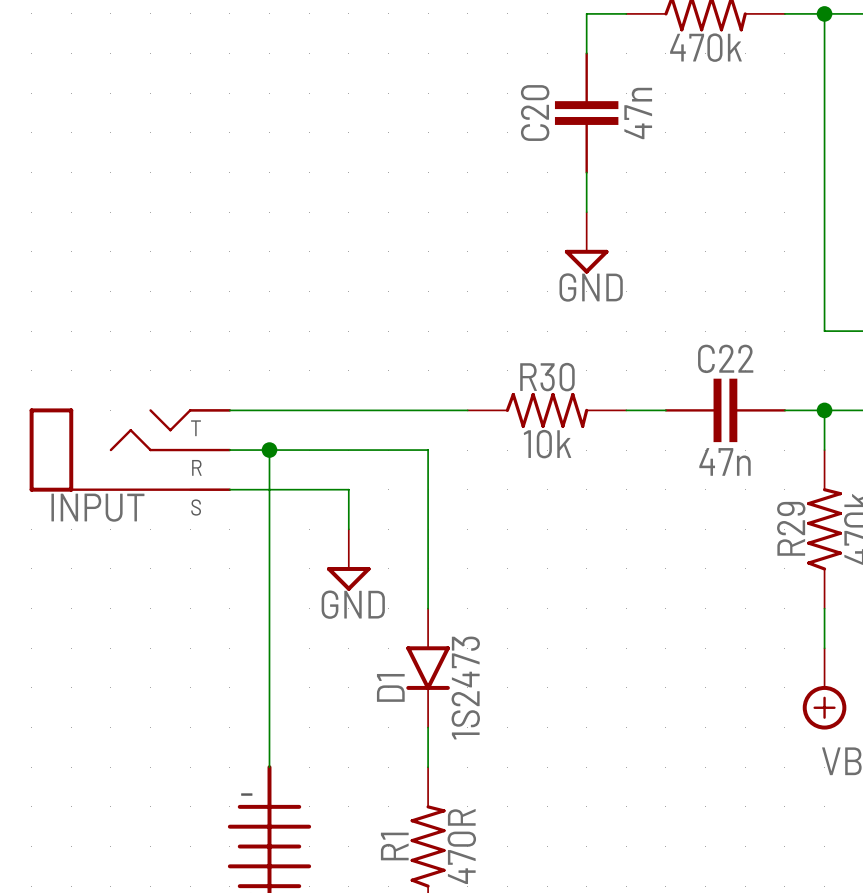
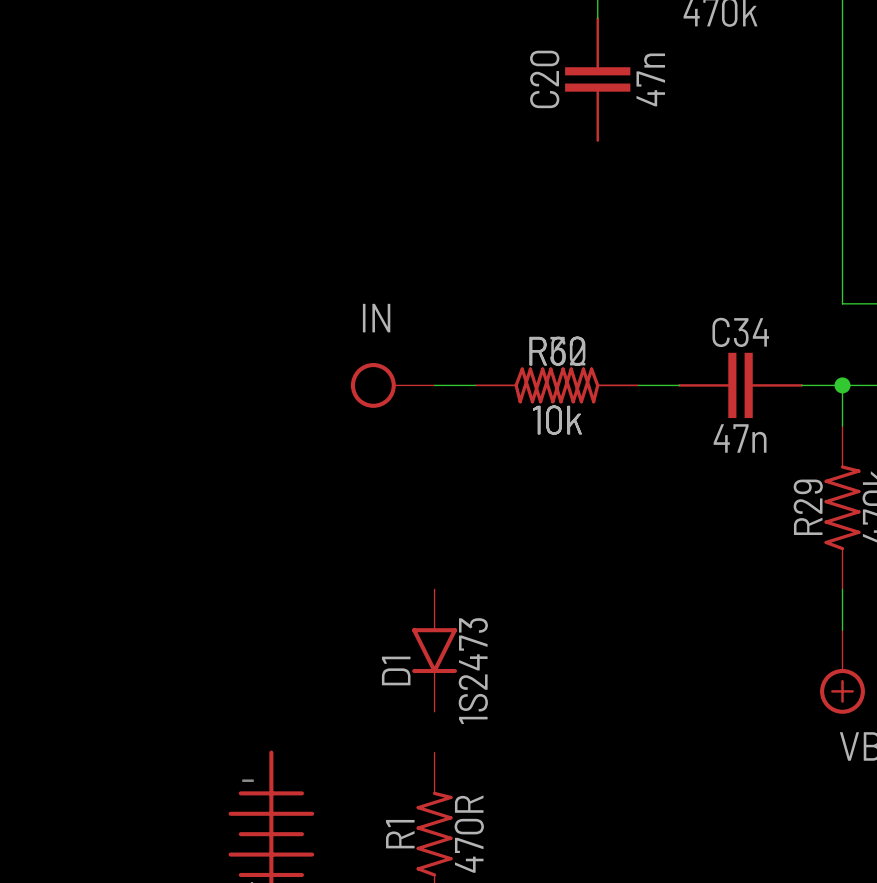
wire: (586, 172) (586, 212) -> none
power symbol: GND (586, 242) -> none
C22 name: C22 (725, 358) -> C34 (740, 332)
wire: (229, 410) (428, 410) -> none
IN: none -> (392, 385)
part: none -> 10k (556, 385)
INPUT: (130, 450) -> none
wire: (229, 450) (428, 450) (428, 608) -> none
wire: (269, 450) (269, 767) -> none
junction: (269, 450) -> none
wire: (229, 489) (348, 489) (348, 529) -> none
power symbol: GND (348, 560) -> none
wire: (428, 727) (428, 767) -> none

